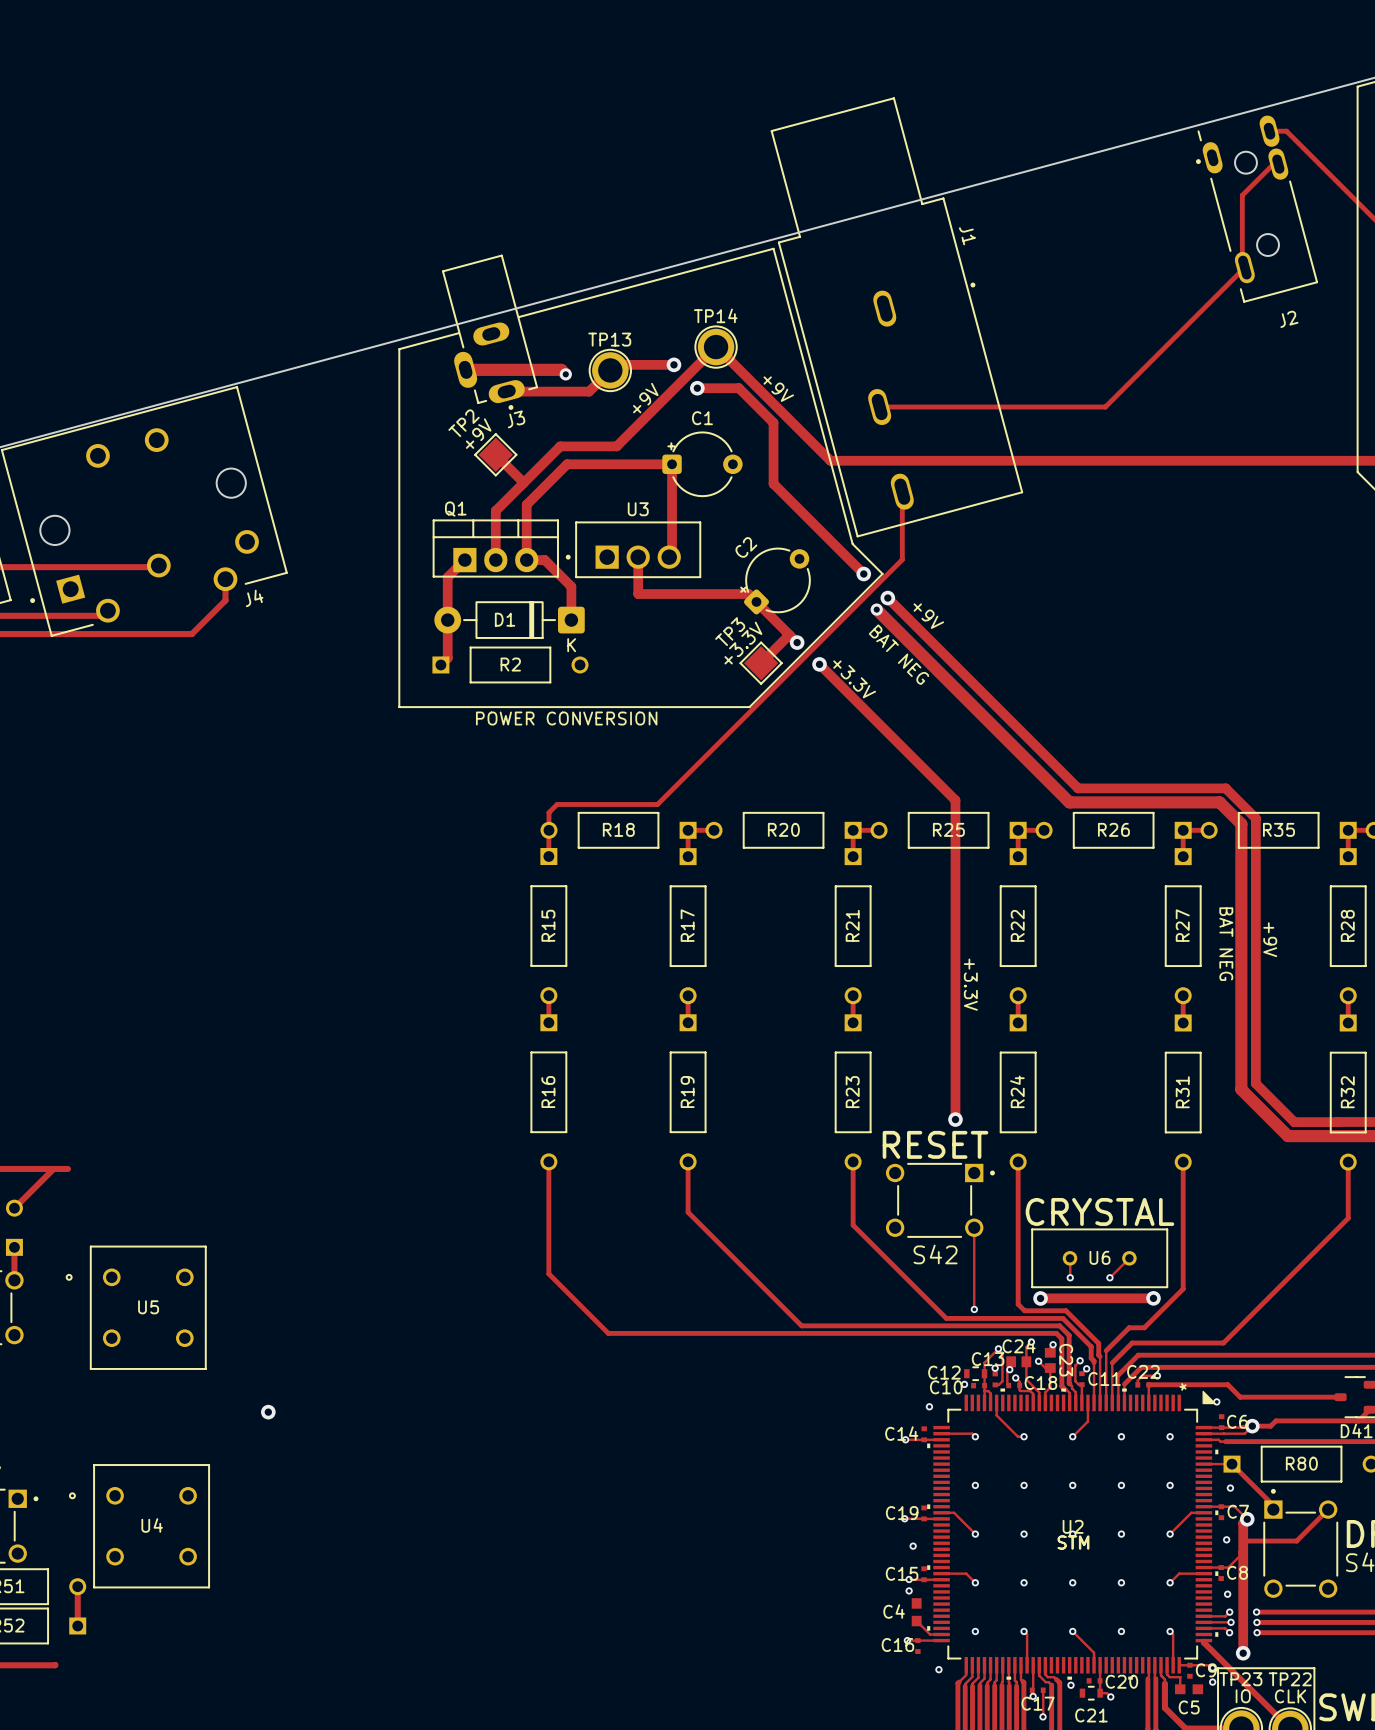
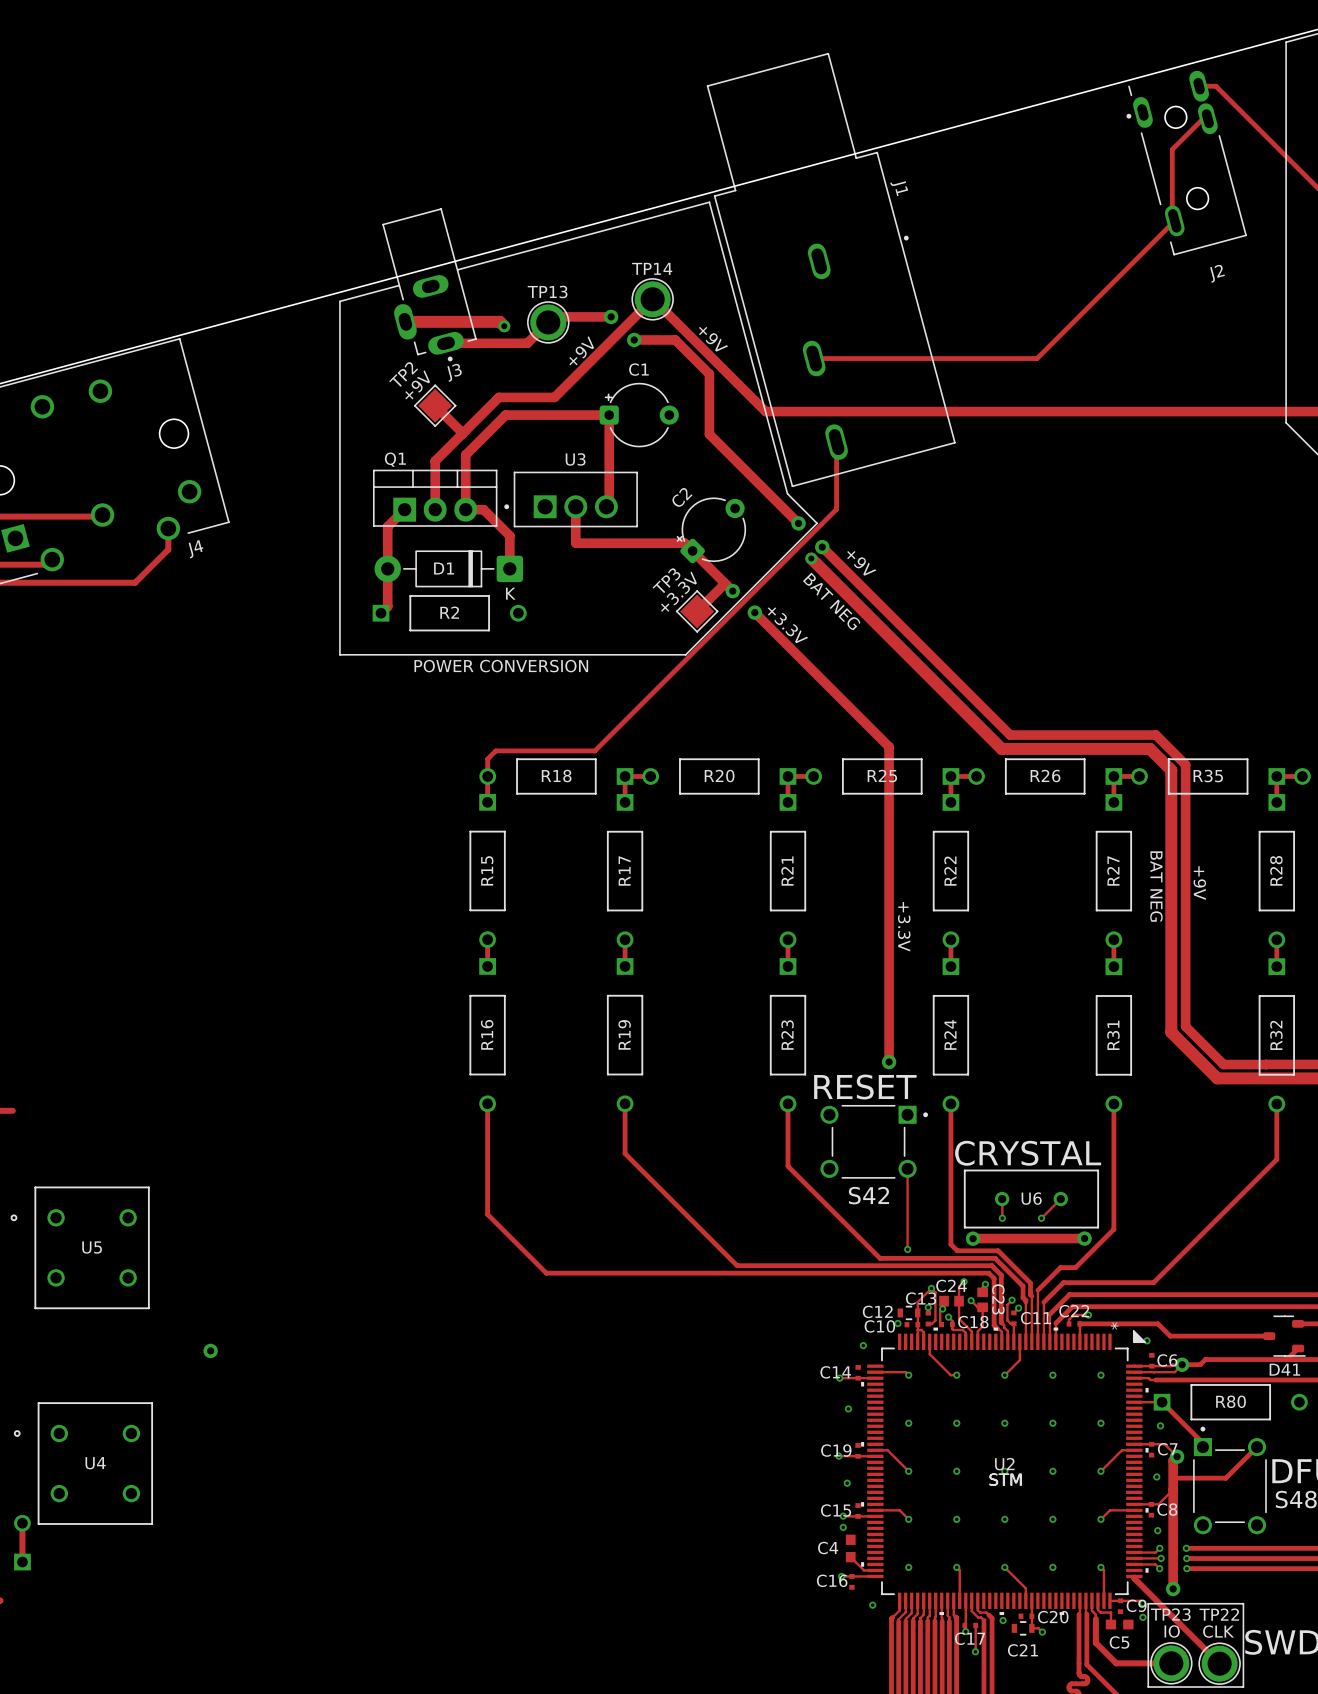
via: none -> (848, 1408)

